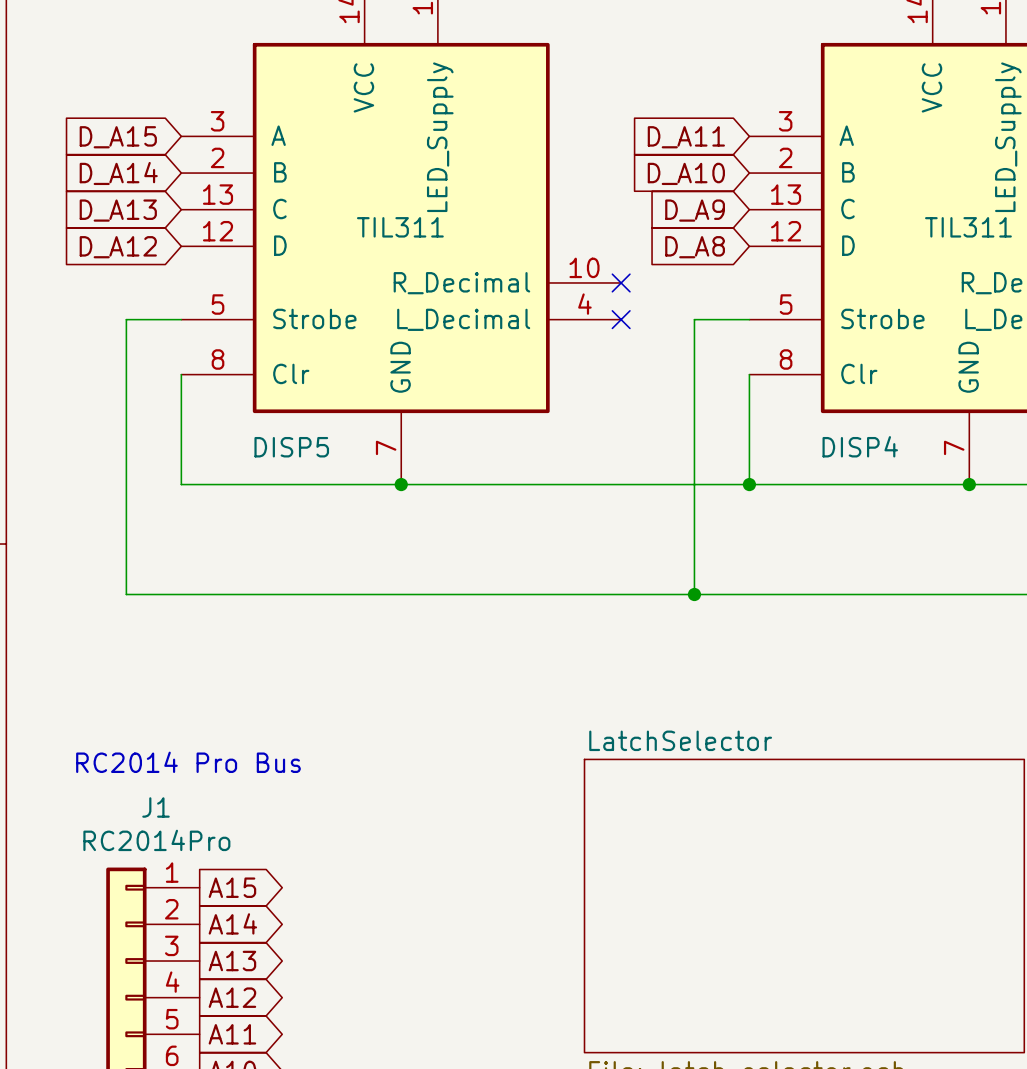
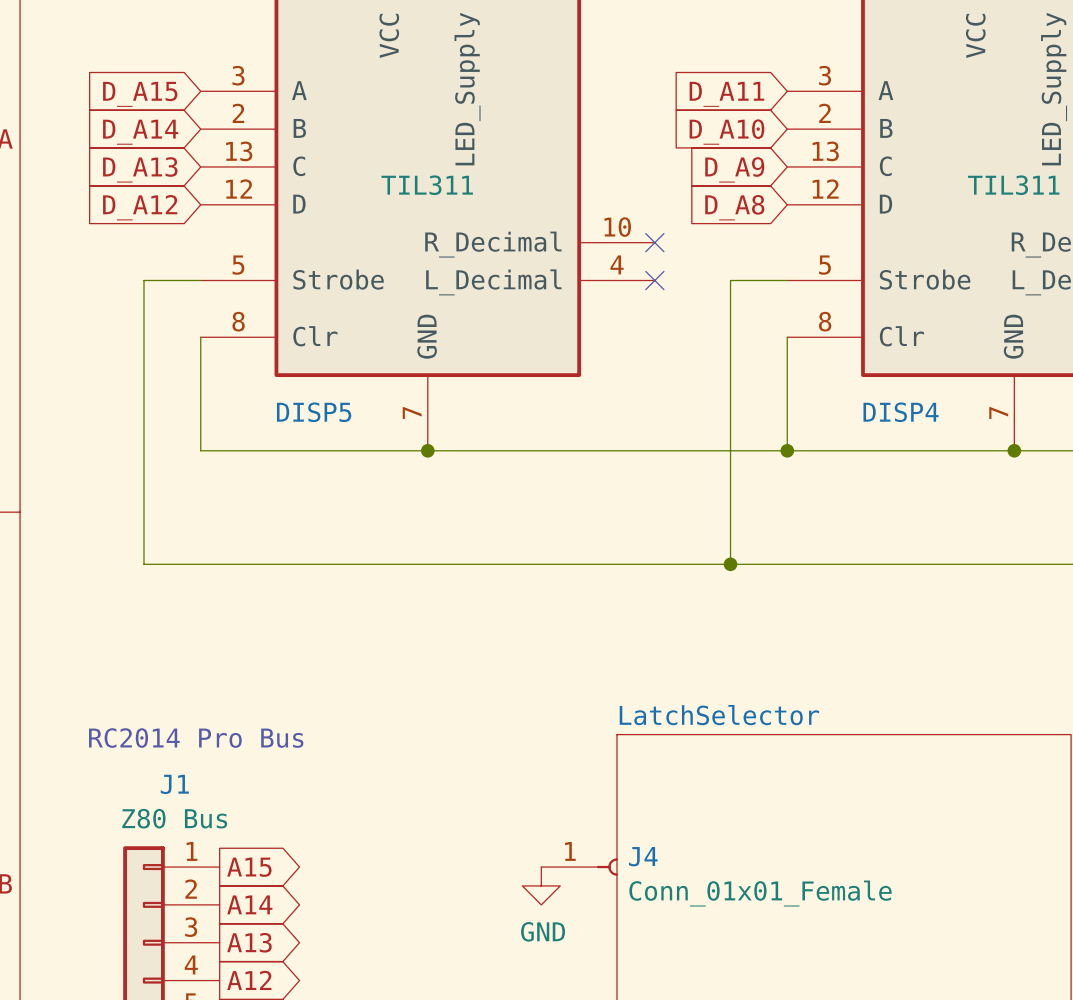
J1 value: RC2014Pro (156, 840) -> Z80 Bus (174, 818)
J4: none -> Conn_01x01_Female (579, 867)
power symbol: none -> GND (541, 885)

